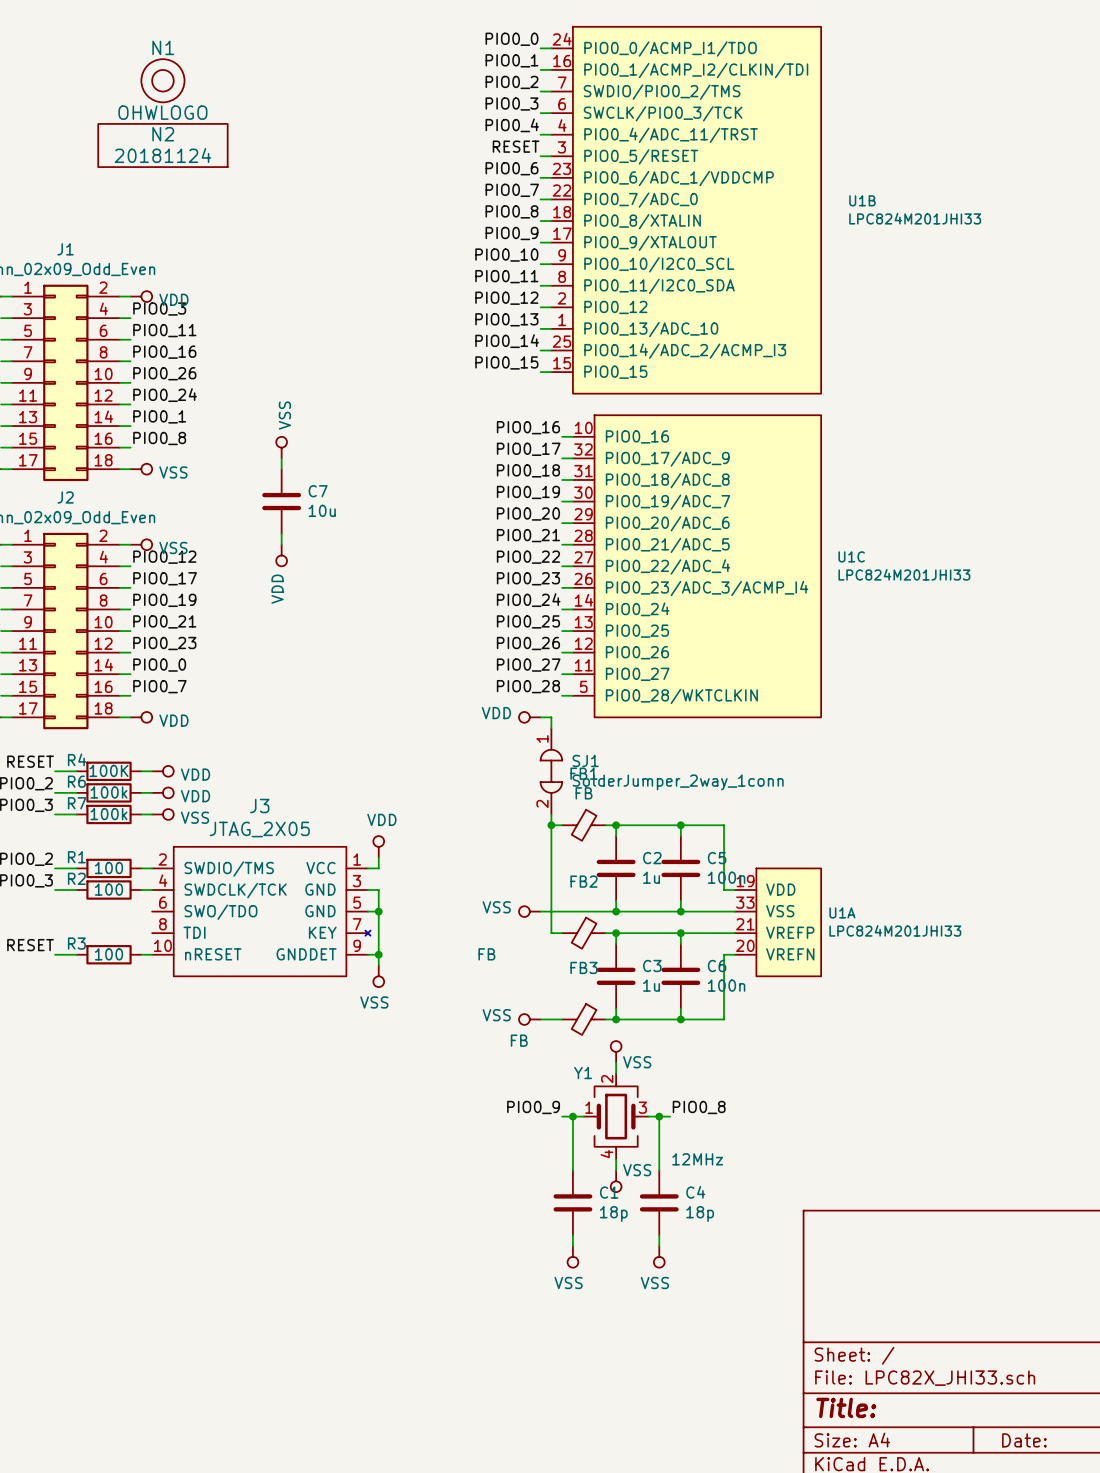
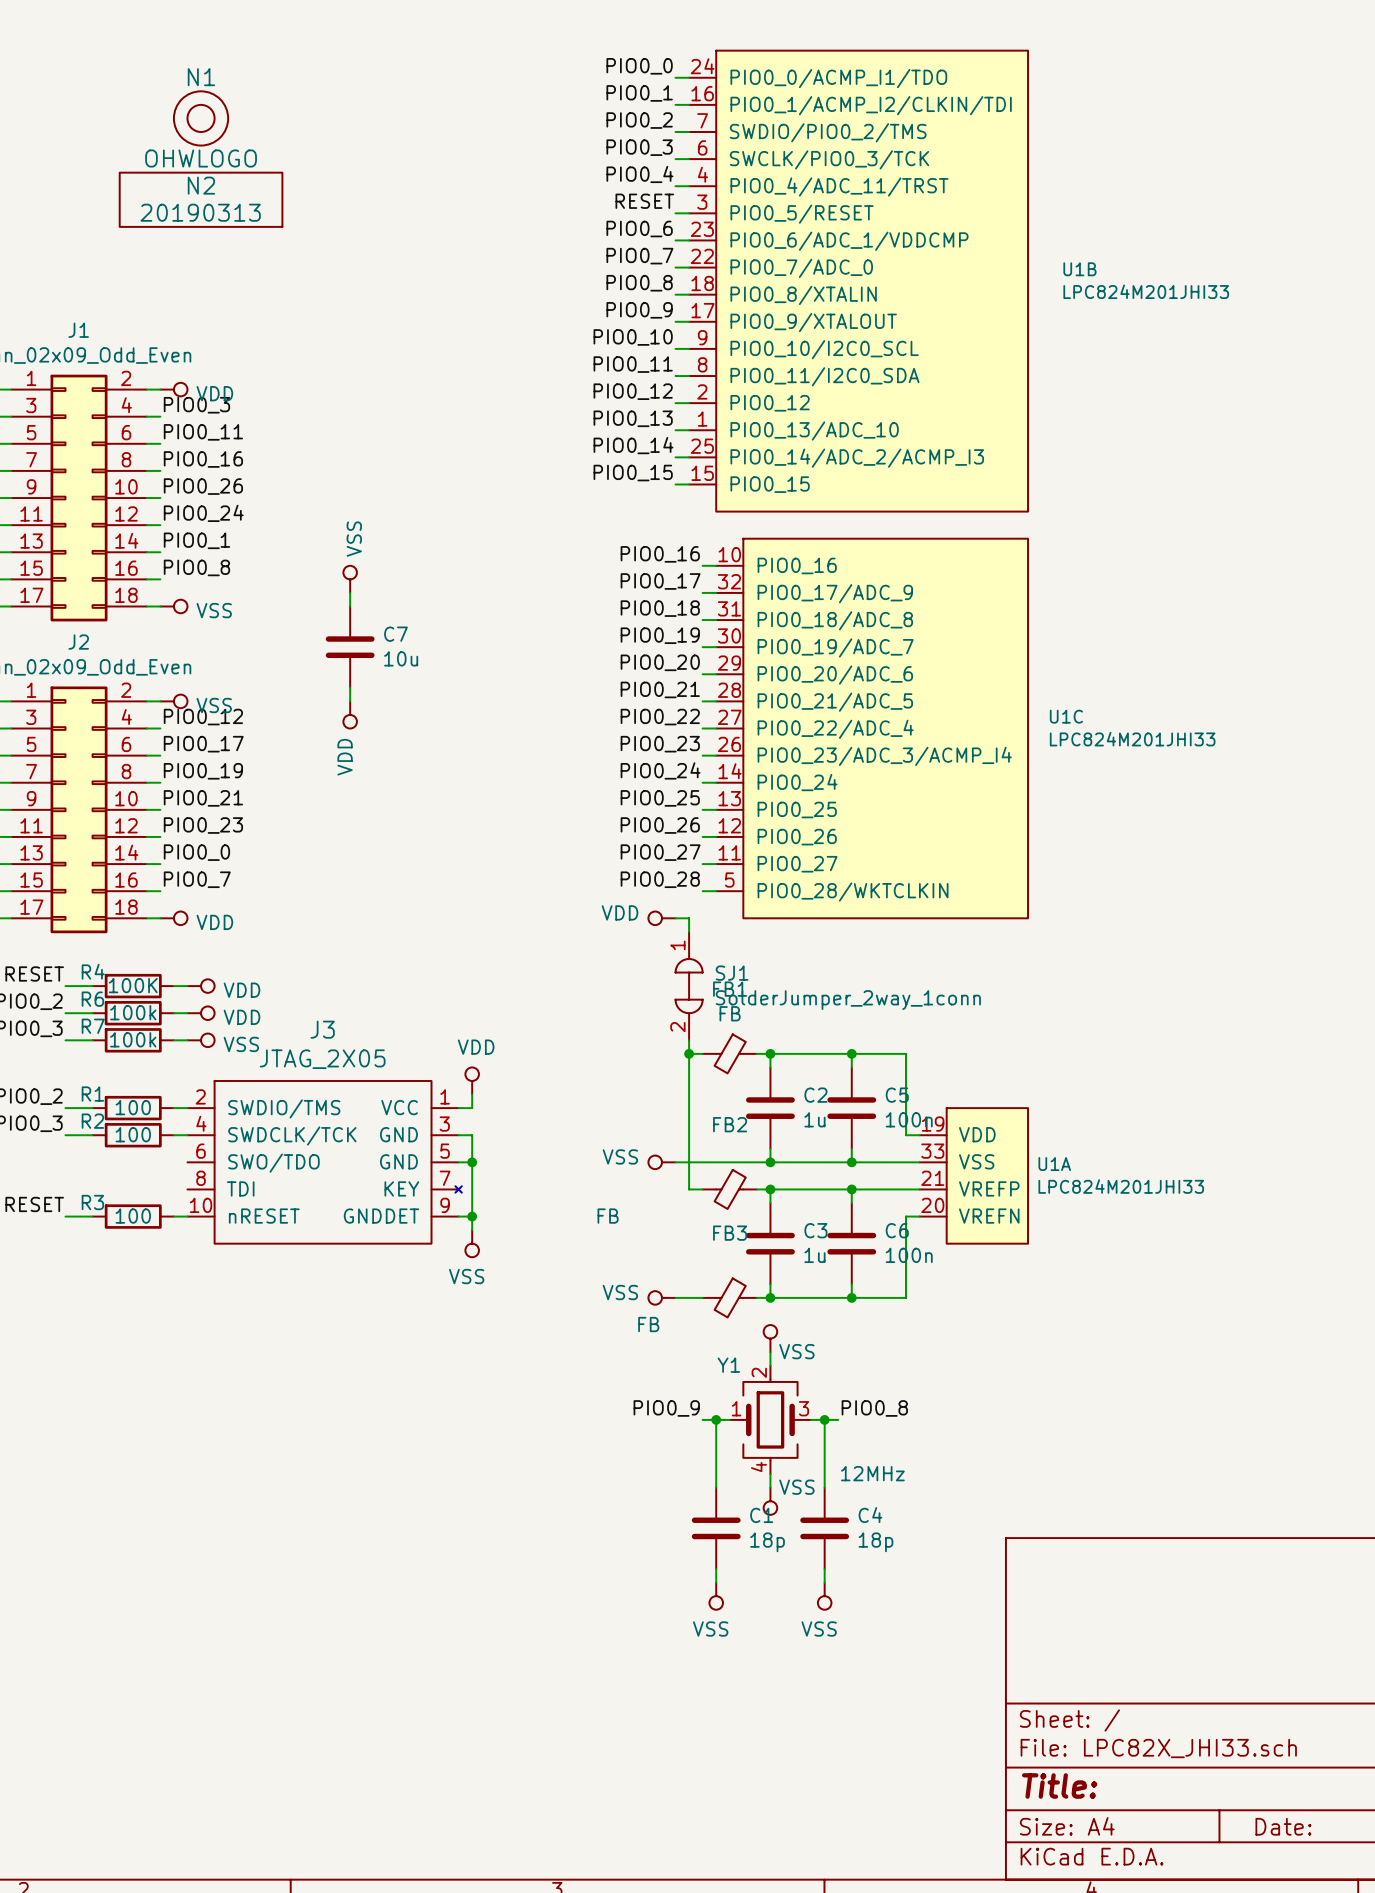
N2 value: 20181124 (162, 155) -> 20190313 (200, 212)

